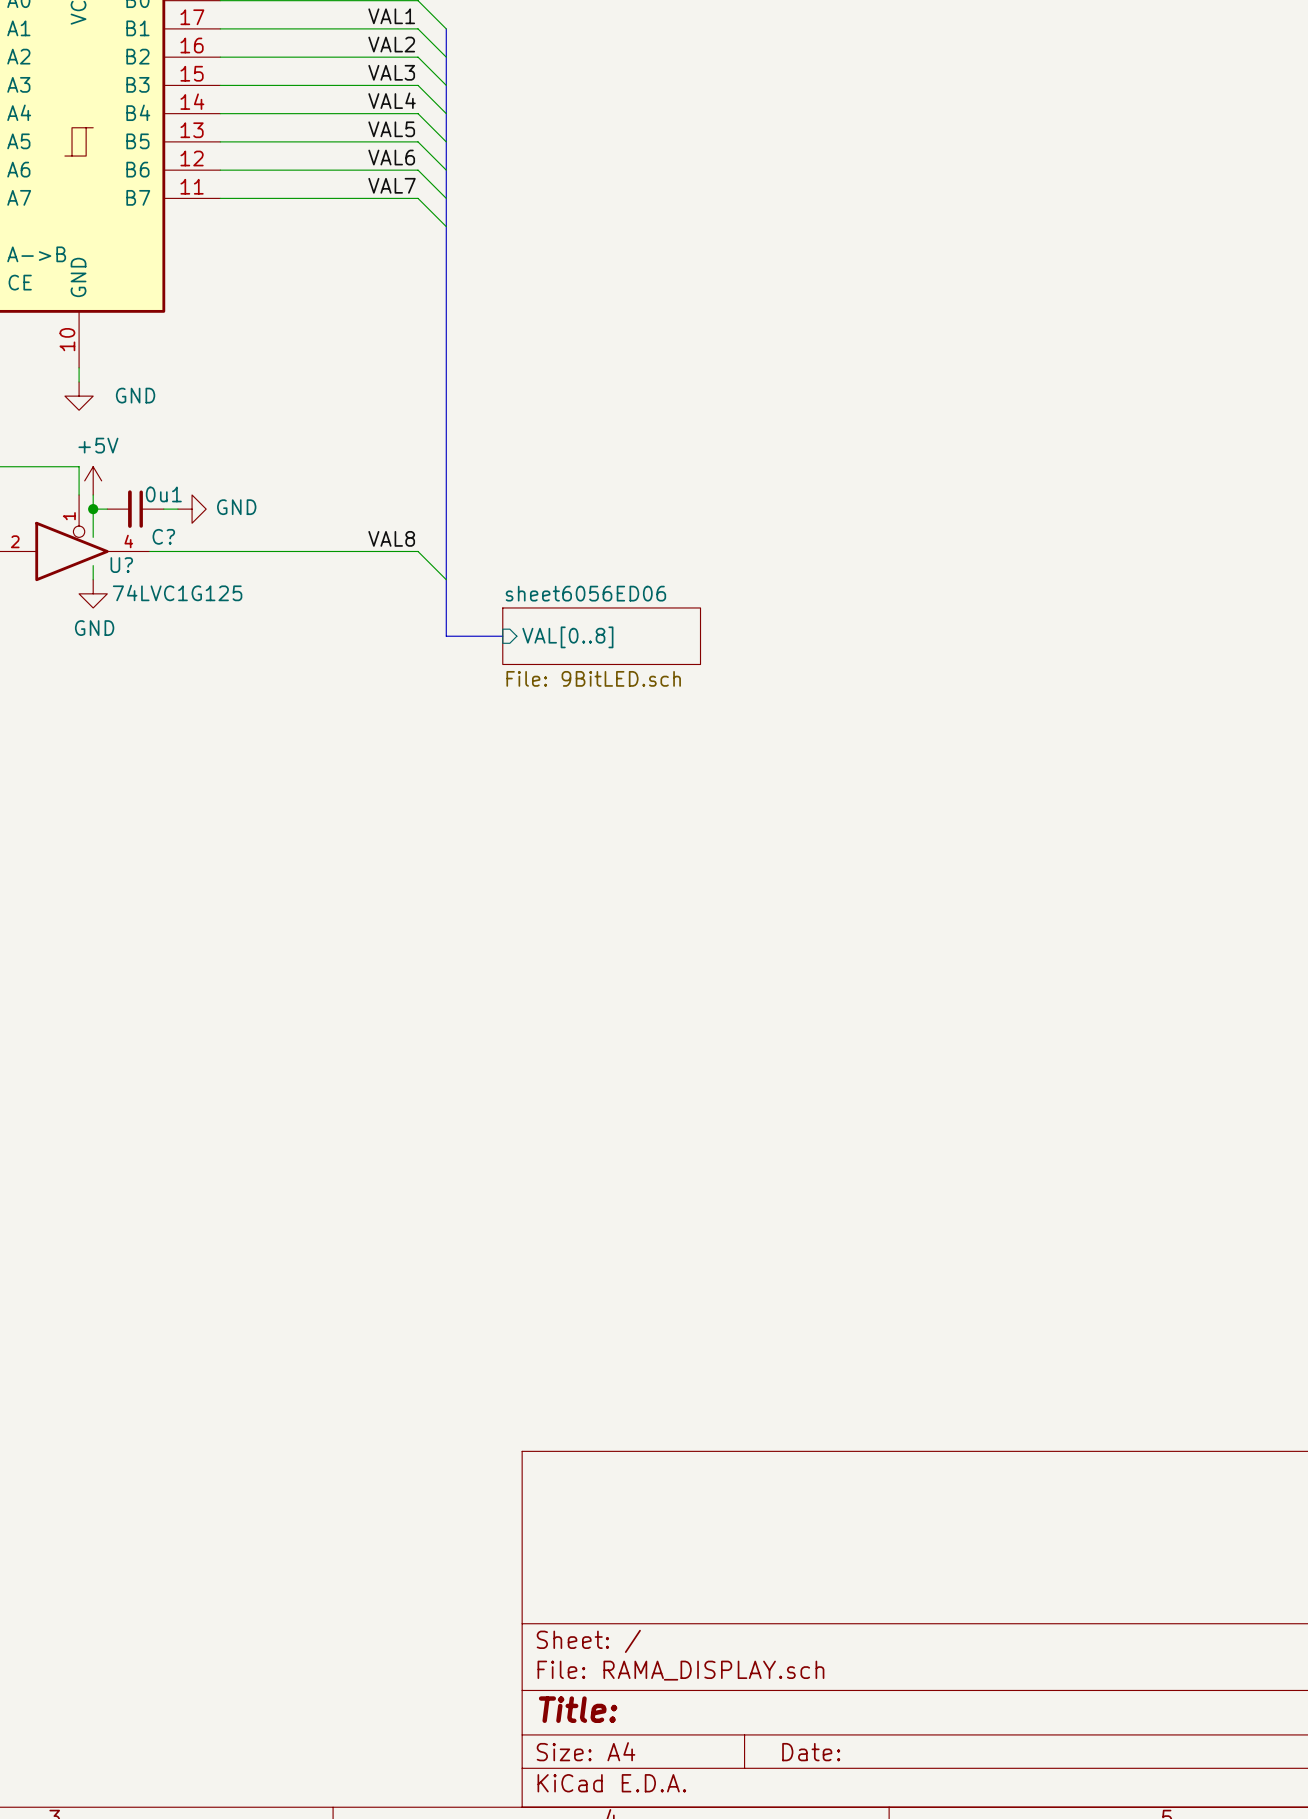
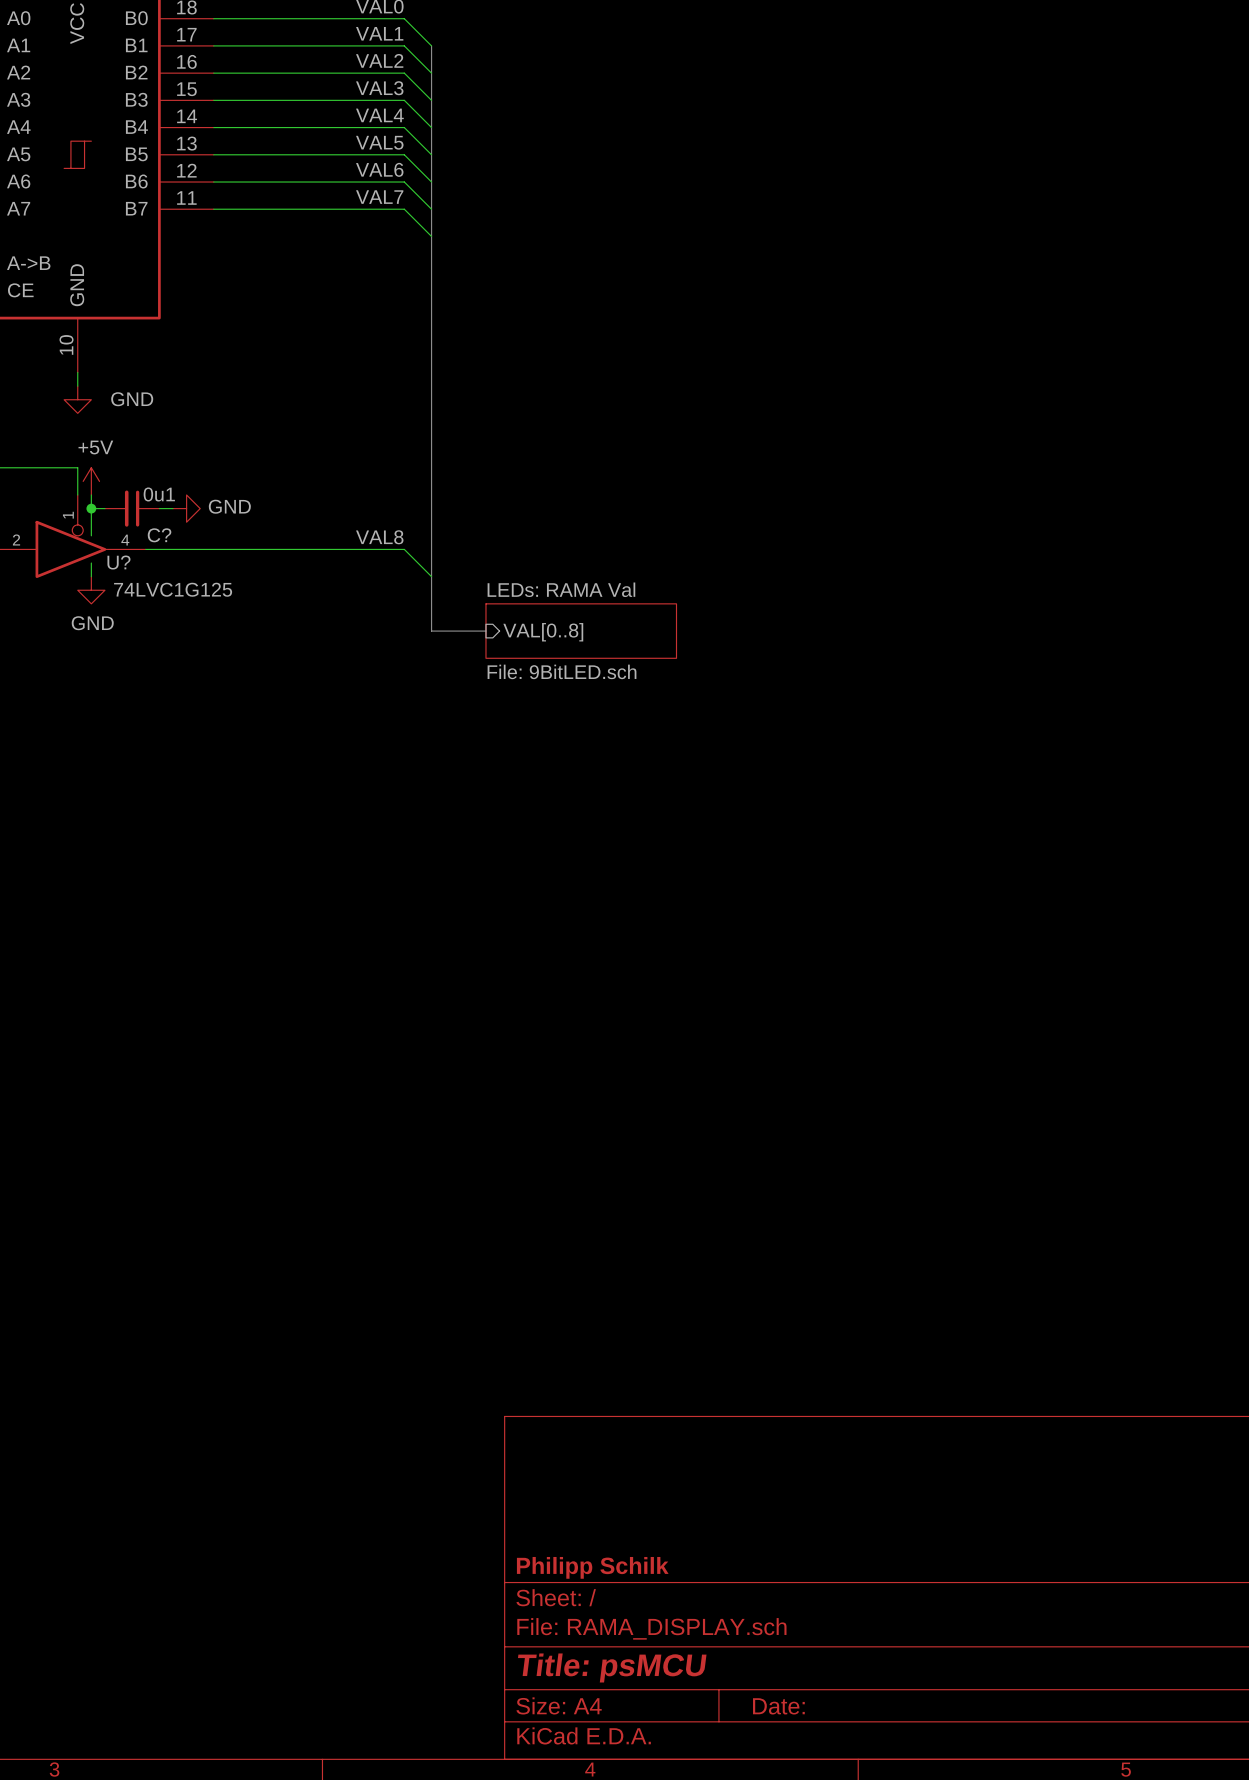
sheet sheet6056ED06 name: sheet6056ED06 (585, 593) -> LEDs: RAMA Val (561, 589)
title block: none -> Philipp Schilk (592, 1567)
title block: Title: (578, 1709) -> Title: psMCU (612, 1667)

